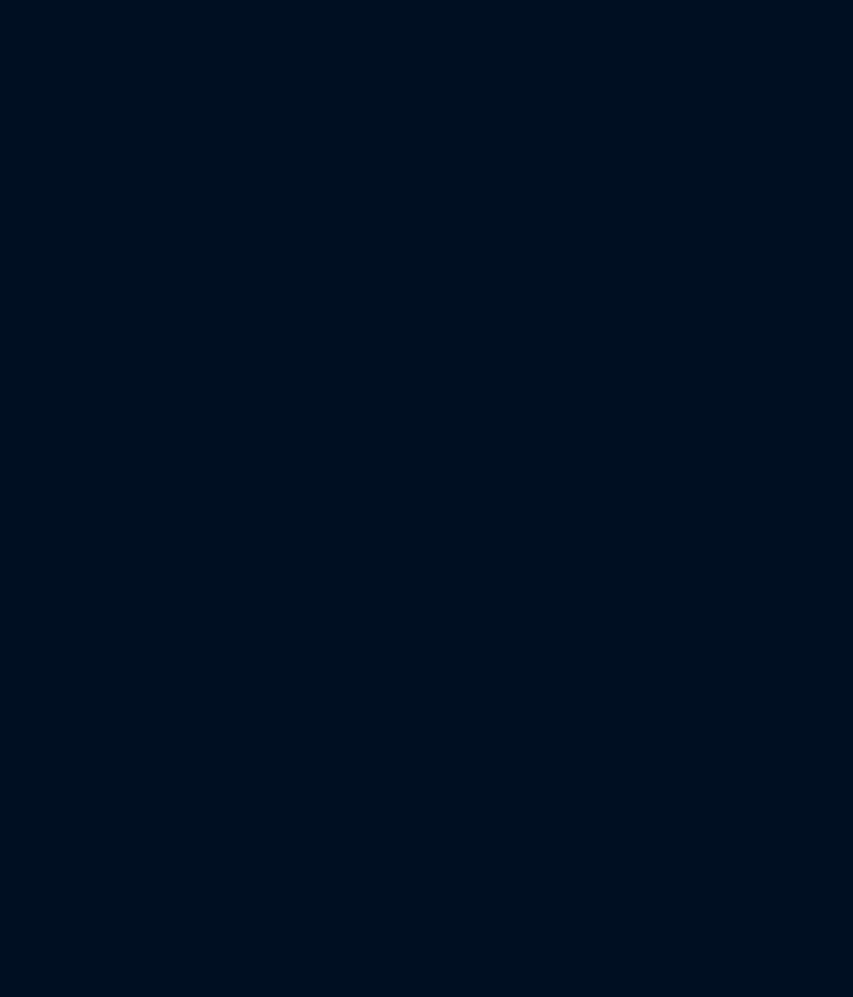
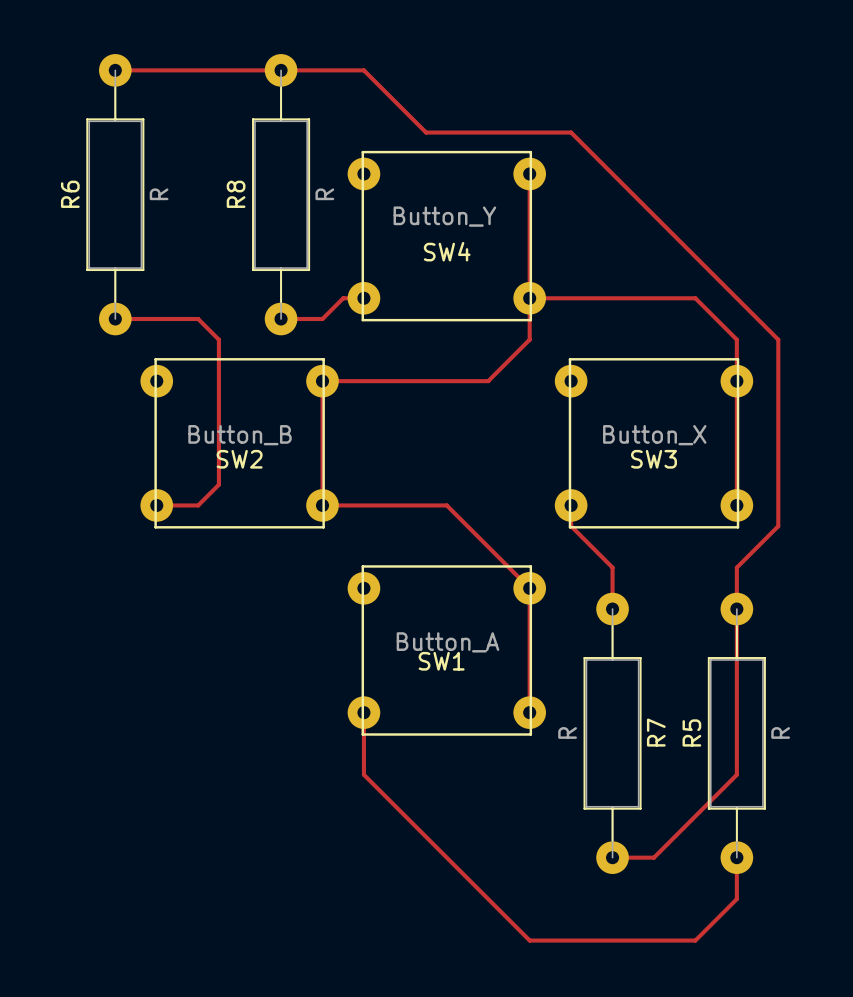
top track: none -> (115, 70) (363, 70) (426, 132) (571, 132) (778, 339) (778, 526) (736, 567) (736, 774) (653, 857) (612, 857)
top track: none -> (529, 173) (529, 339) (488, 381) (322, 381) (322, 505) (446, 505) (529, 588) (529, 712)
R6: none -> R (115, 194)
R8: none -> R (281, 194)
SW4: none -> Button_Y (446, 236)
top track: none -> (363, 298) (343, 298) (322, 318) (281, 318)
top track: none -> (529, 298) (695, 298) (736, 339) (736, 505)
top track: none -> (115, 318) (198, 318) (218, 339) (218, 484) (198, 505) (156, 505)
SW2: none -> Button_B (239, 443)
SW3: none -> Button_X (653, 443)
top track: none -> (571, 505) (571, 526) (612, 567) (612, 609)
SW1: none -> Button_A (446, 650)
top track: none -> (363, 712) (363, 774) (529, 940) (695, 940) (736, 899) (736, 857)
R7: none -> R (612, 733)
R5: none -> R (736, 733)

